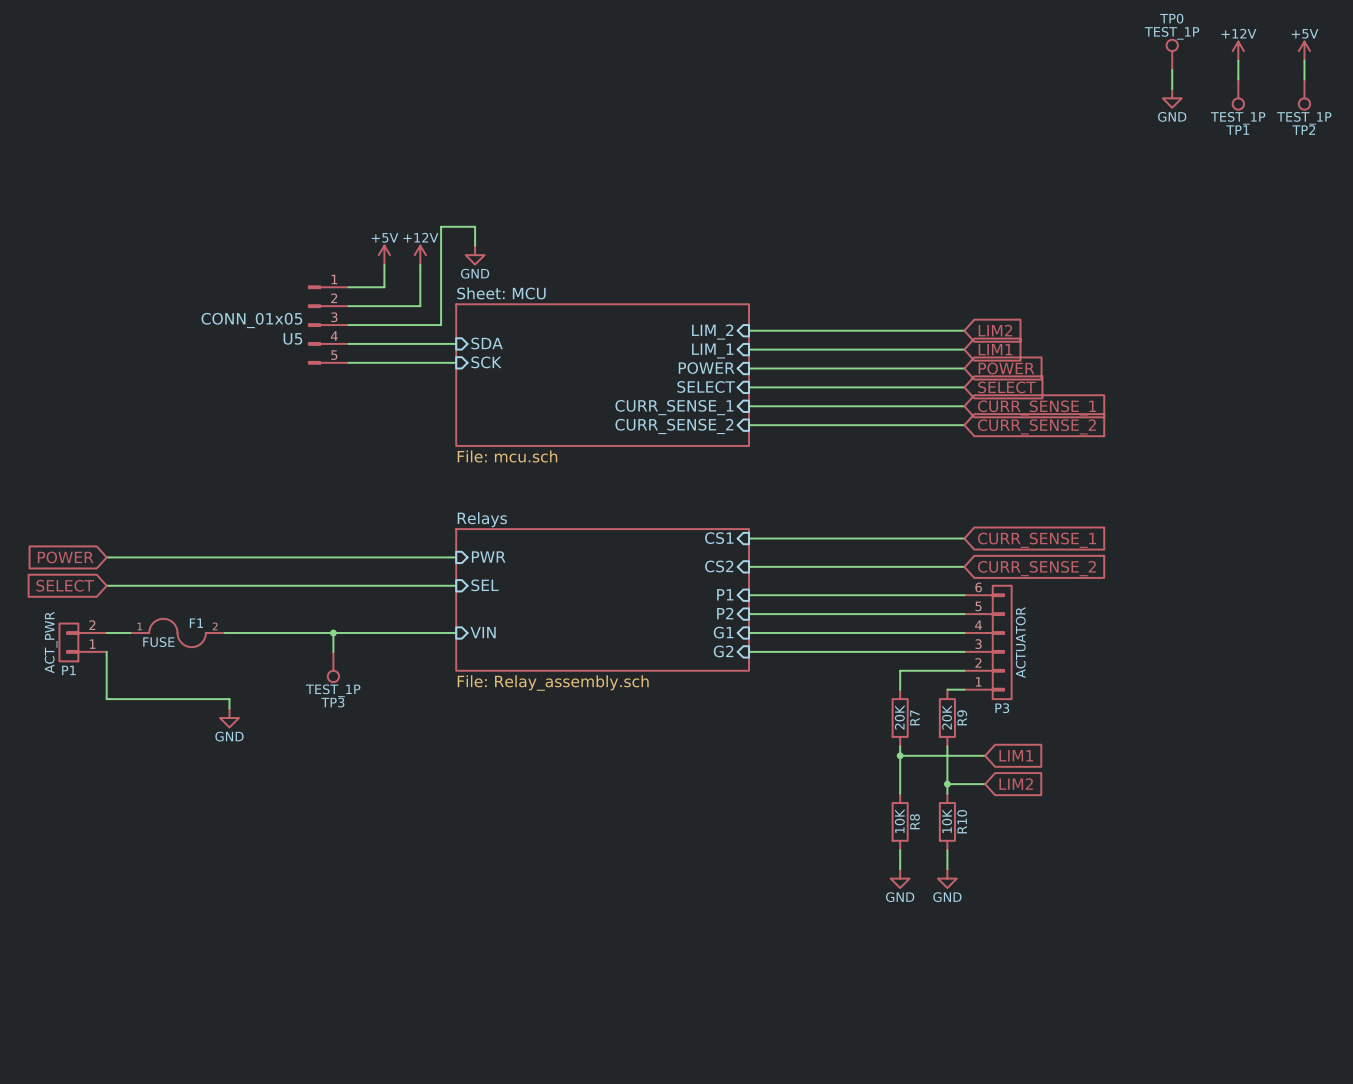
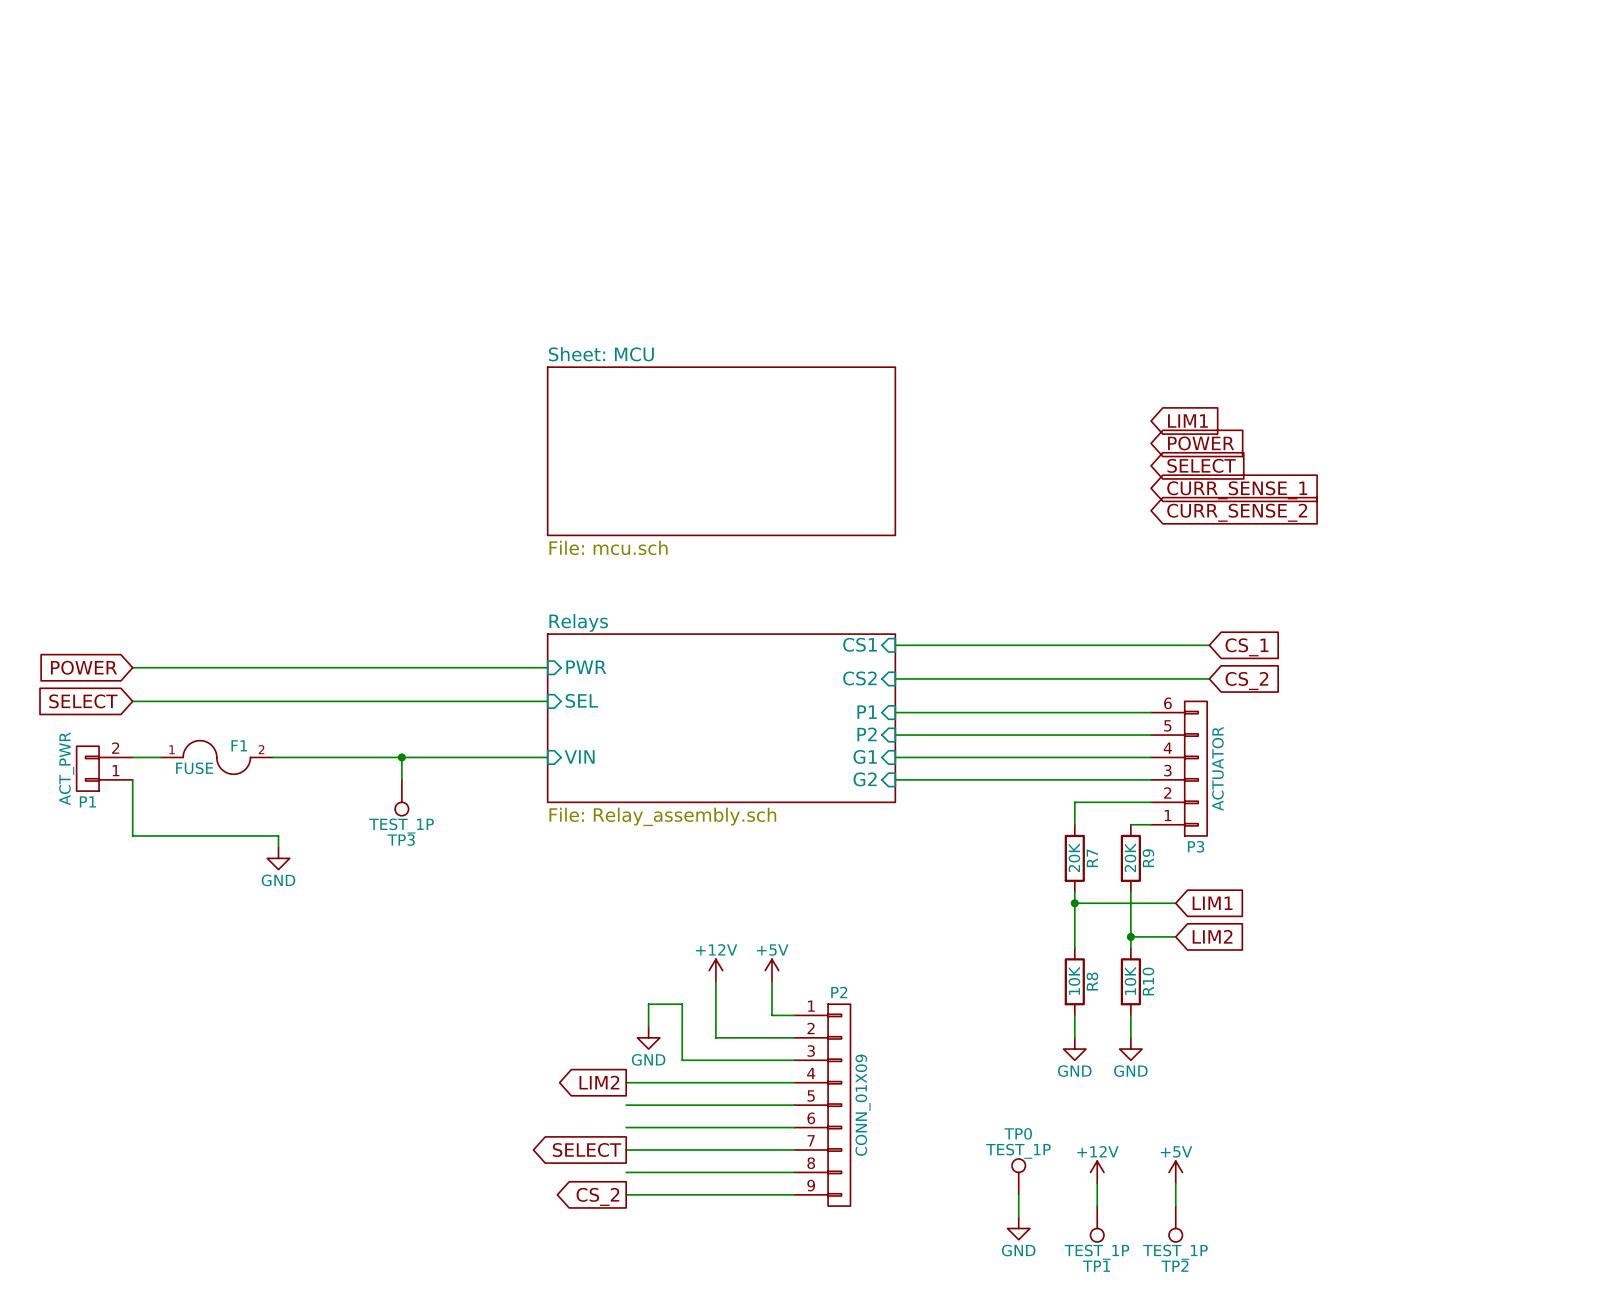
power symbol: +12V (1238, 51) -> none
power symbol: +5V (1304, 51) -> none
TP0 position: (1172, 54) -> (1018, 1176)
wire: (1238, 60) (1238, 79) -> none
wire: (1304, 60) (1304, 79) -> none
wire: (1172, 70) (1172, 88) -> none
TP1 position: (1238, 94) -> (1097, 1224)
TP2 position: (1304, 94) -> (1175, 1224)
power symbol: GND (1172, 98) -> none
wire: (475, 245) (475, 226) (441, 226) (441, 325) (348, 325) -> none
power symbol: +5V (384, 255) -> none
power symbol: +12V (420, 255) -> none
power symbol: GND (475, 255) -> none
wire: (384, 264) (384, 287) (348, 287) -> none
wire: (420, 264) (420, 306) (348, 306) -> none
U5: CONN_01x05 (328, 325) -> none
wire: (749, 330) (964, 330) -> none
global label: LIM2 (995, 330) -> none
sheet pin: LIM_2 (712, 332) -> none
wire: (348, 343) (456, 343) -> none
sheet pin: SDA (487, 343) -> none
wire: (749, 349) (964, 349) -> none
sheet pin: LIM_1 (712, 351) -> none
wire: (348, 362) (456, 362) -> none
sheet pin: SCK (486, 362) -> none
sheet pin: POWER (706, 368) -> none
wire: (749, 368) (964, 368) -> none
sheet pin: SELECT (706, 386) -> none
wire: (749, 387) (964, 387) -> none
wire: (749, 406) (964, 406) -> none
sheet pin: CURR_SENSE_1 (674, 407) -> none
wire: (749, 425) (964, 425) -> none
sheet pin: CURR_SENSE_2 (674, 426) -> none
wire: none -> (1151, 645) (1209, 645)
global label: CURR_SENSE_1 (1037, 540) -> none
global label: none -> CS_1 (1246, 647)
wire: none -> (1151, 678) (1209, 678)
global label: CURR_SENSE_2 (1036, 568) -> none
global label: none -> CS_2 (1246, 681)
power symbol: none -> +12V (715, 970)
power symbol: none -> +5V (771, 970)
wire: none -> (715, 981) (715, 1037) (794, 1037)
wire: none -> (771, 981) (771, 1015) (794, 1015)
wire: none -> (648, 1026) (648, 1004) (682, 1004) (682, 1060) (794, 1060)
power symbol: none -> GND (648, 1037)
global label: none -> LIM2 (599, 1082)
wire: none -> (626, 1082) (794, 1082)
wire: none -> (626, 1105) (794, 1105)
P2: none -> CONN_01X09 (822, 1105)
wire: none -> (626, 1127) (794, 1127)
global label: none -> SELECT (587, 1150)
wire: none -> (626, 1150) (794, 1150)
wire: none -> (626, 1172) (794, 1172)
power symbol: none -> +12V (1097, 1172)
power symbol: none -> +5V (1175, 1172)
wire: none -> (1097, 1183) (1097, 1206)
wire: none -> (1175, 1183) (1175, 1206)
wire: none -> (626, 1194) (794, 1194)
wire: none -> (1018, 1194) (1018, 1217)
global label: none -> CS_2 (597, 1196)
power symbol: none -> GND (1018, 1228)

